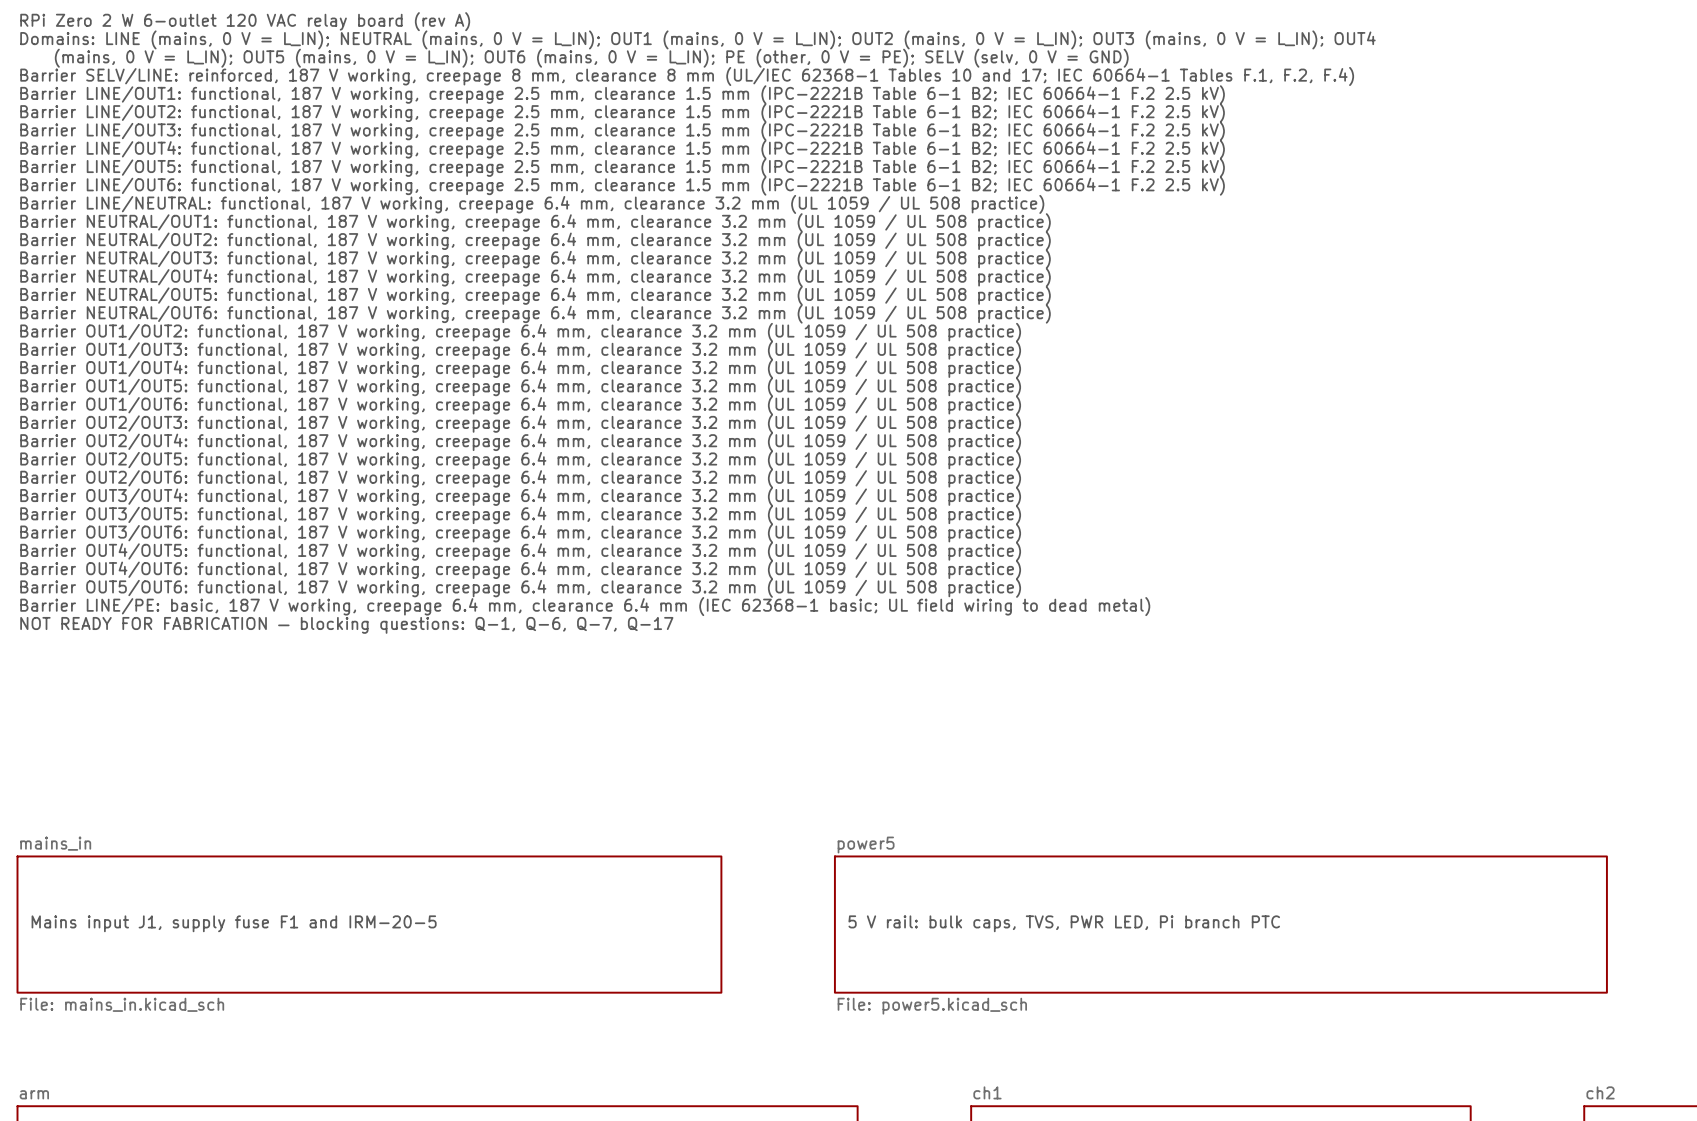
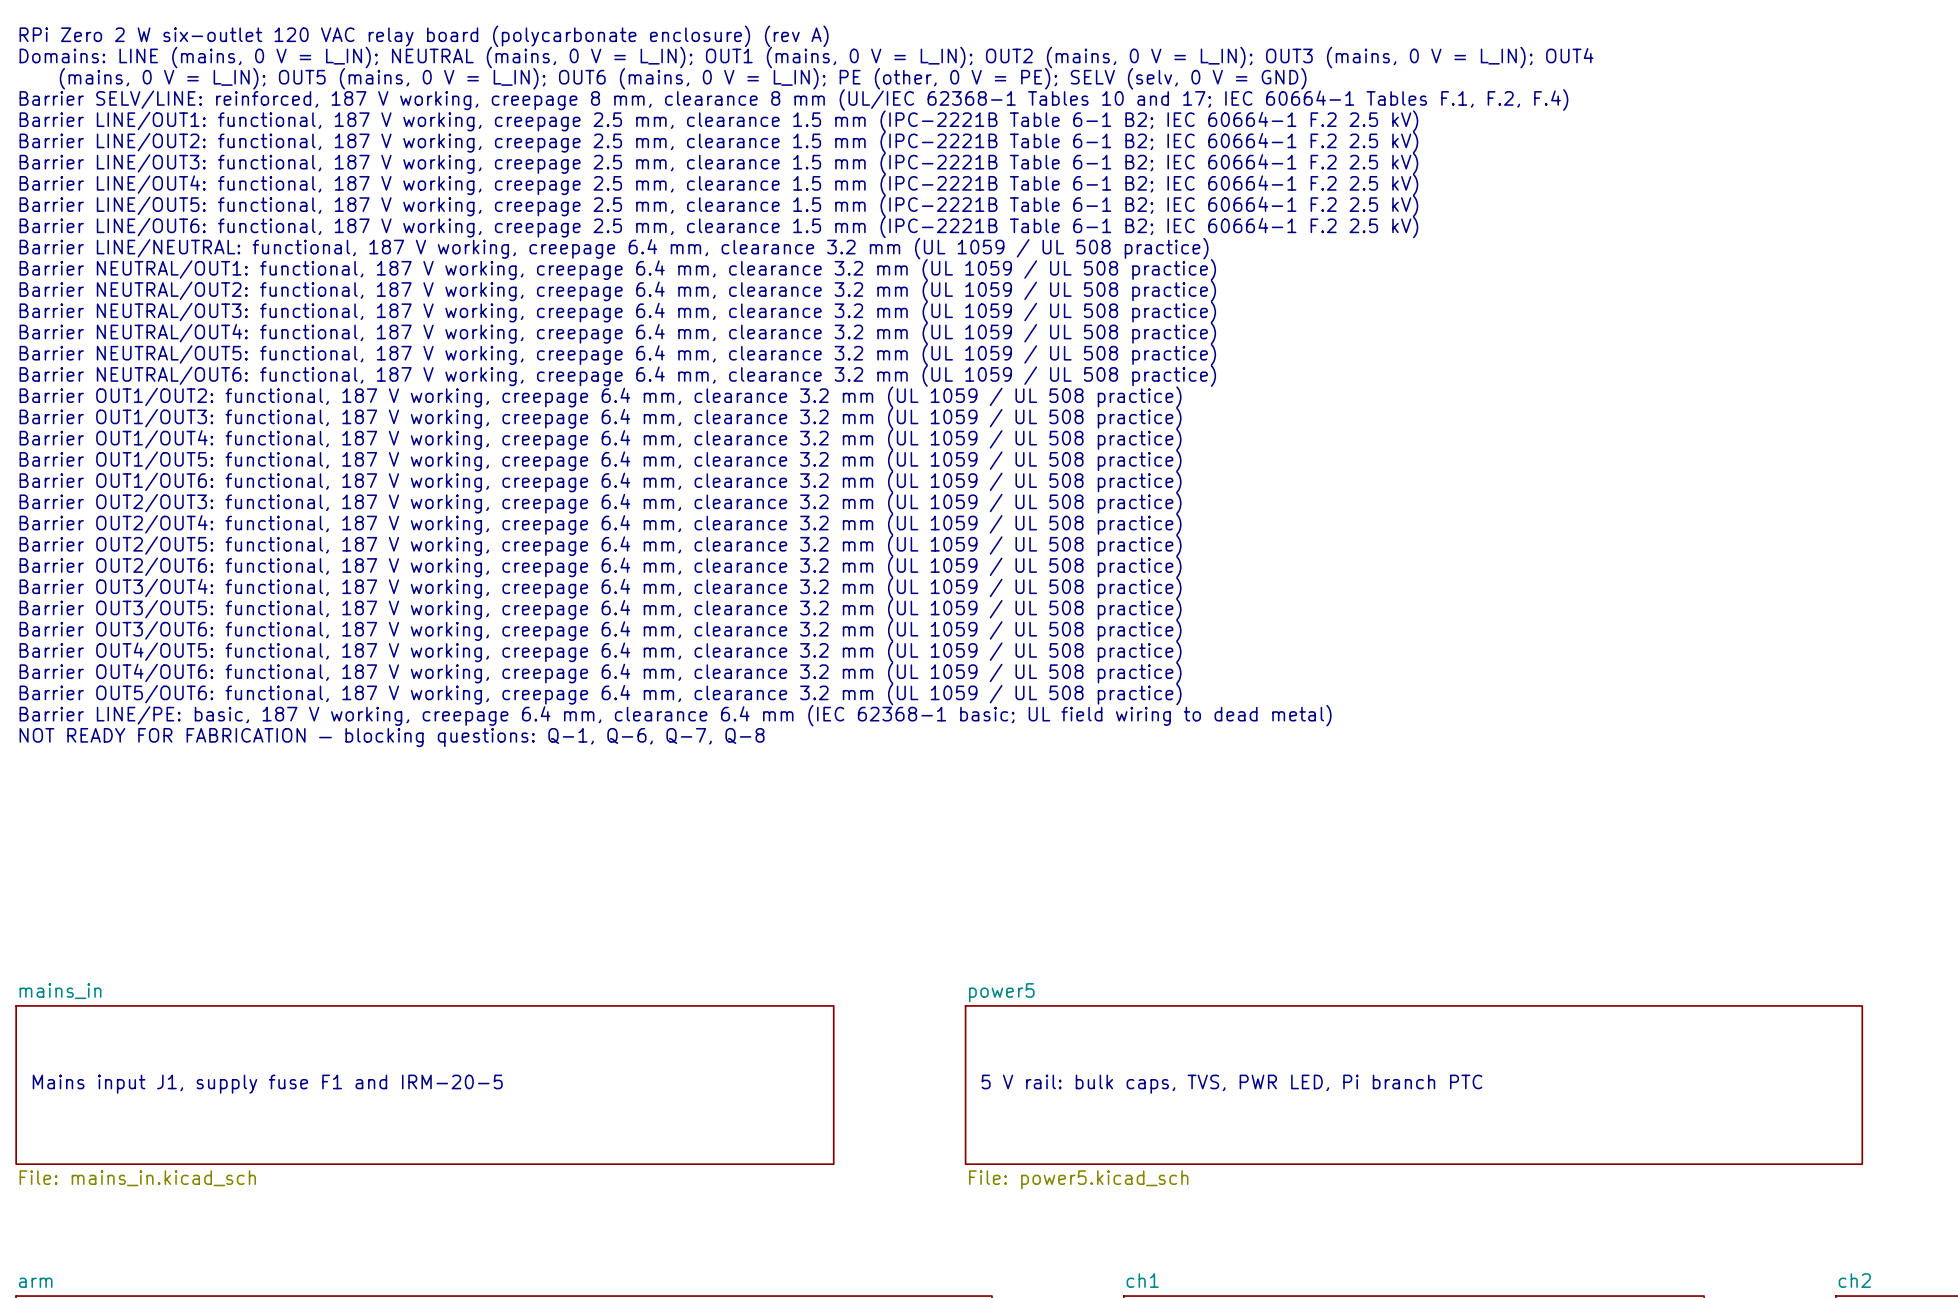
text: RPi Zero 2 W 6-outlet 120 VAC relay board (rev A) (245, 21) -> RPi Zero 2 W six-outlet 120 VAC relay board (polycarbonate enclosure) (rev A) (424, 36)
text: NOT READY FOR FABRICATION — blocking questions: Q-1, Q-6, Q-7, Q-17 (346, 625) -> NOT READY FOR FABRICATION — blocking questions: Q-1, Q-6, Q-7, Q-8 (392, 737)

